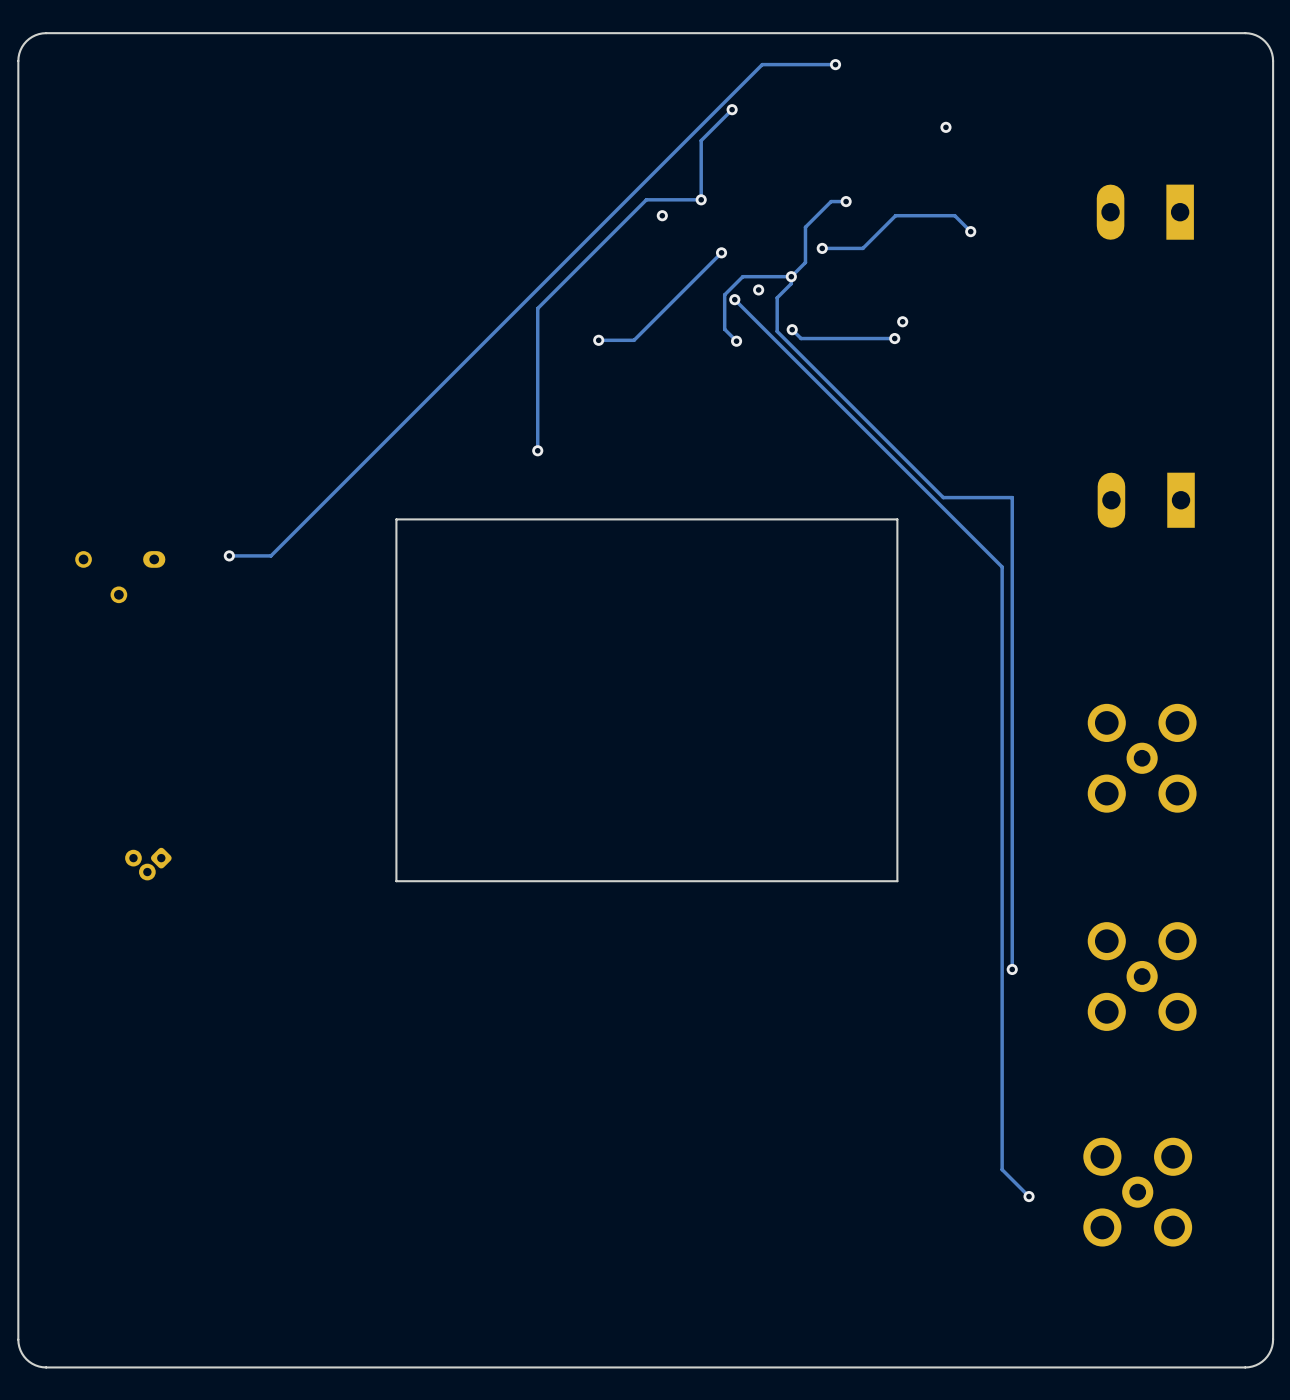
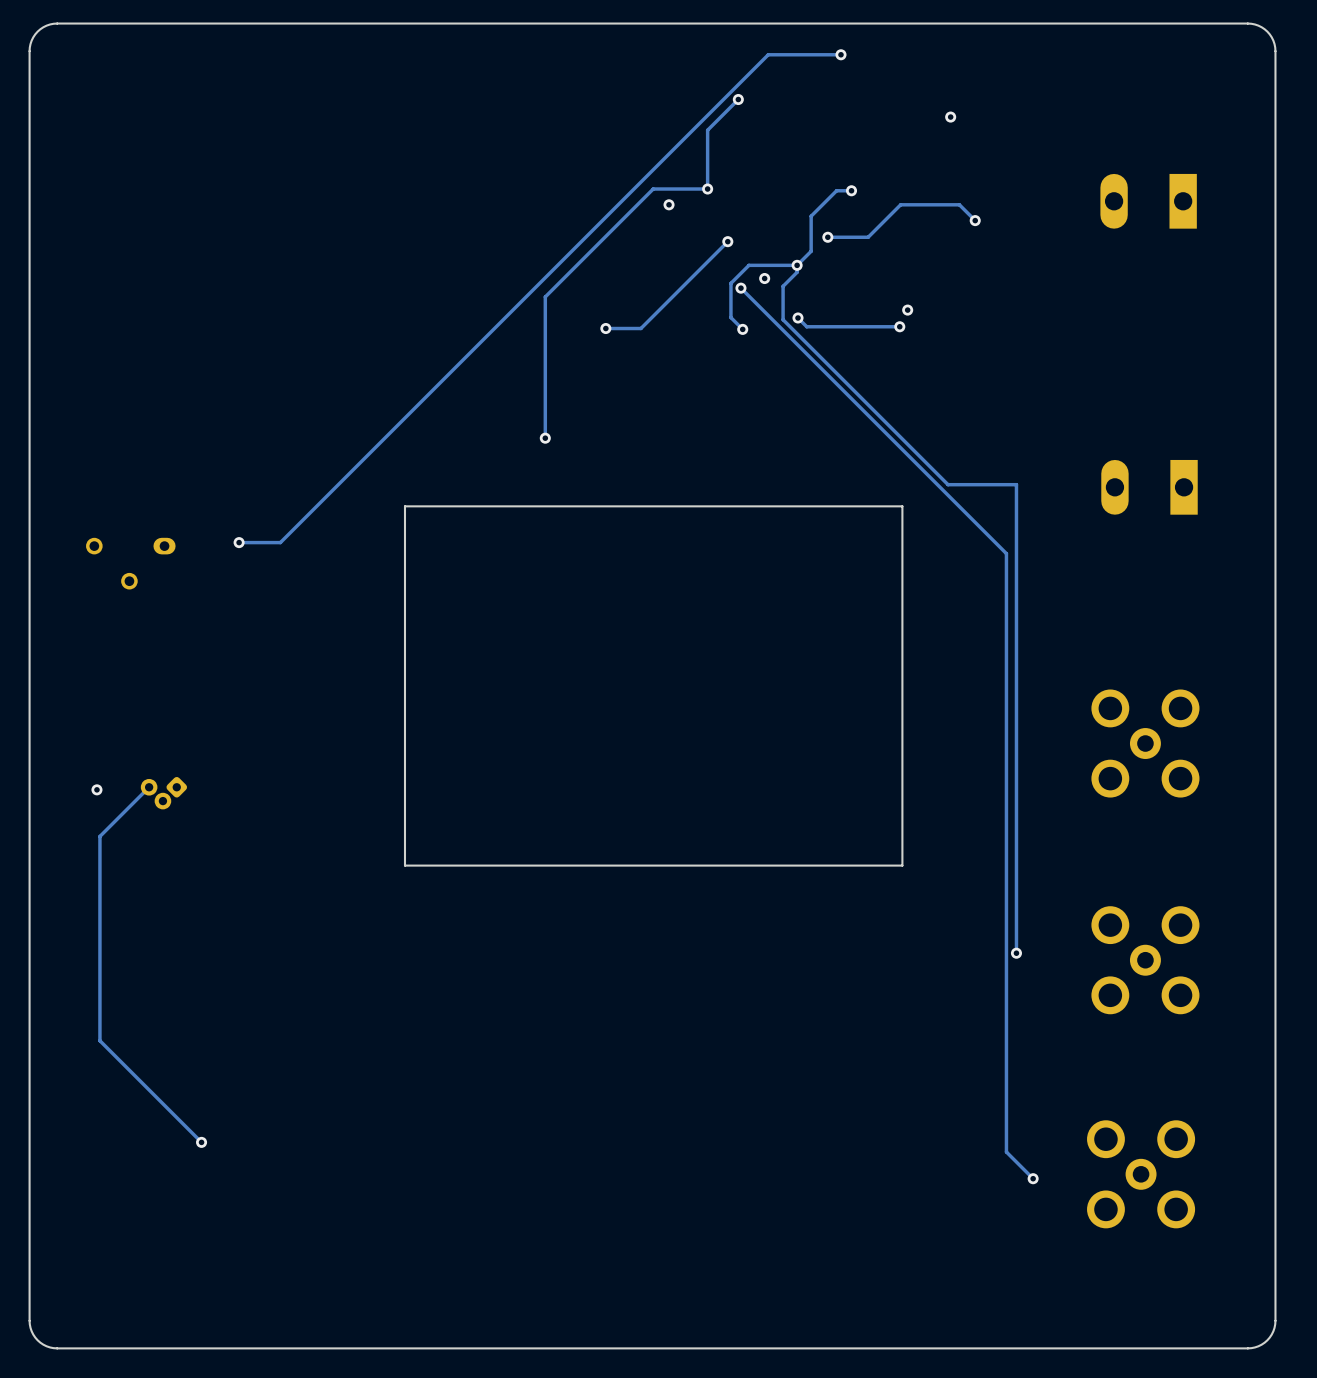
track: none -> (149, 787) (99, 836) (99, 1040) (201, 1142)
via: none -> (96, 789)
part position: (148, 864) -> (163, 793)
via: none -> (201, 1142)

